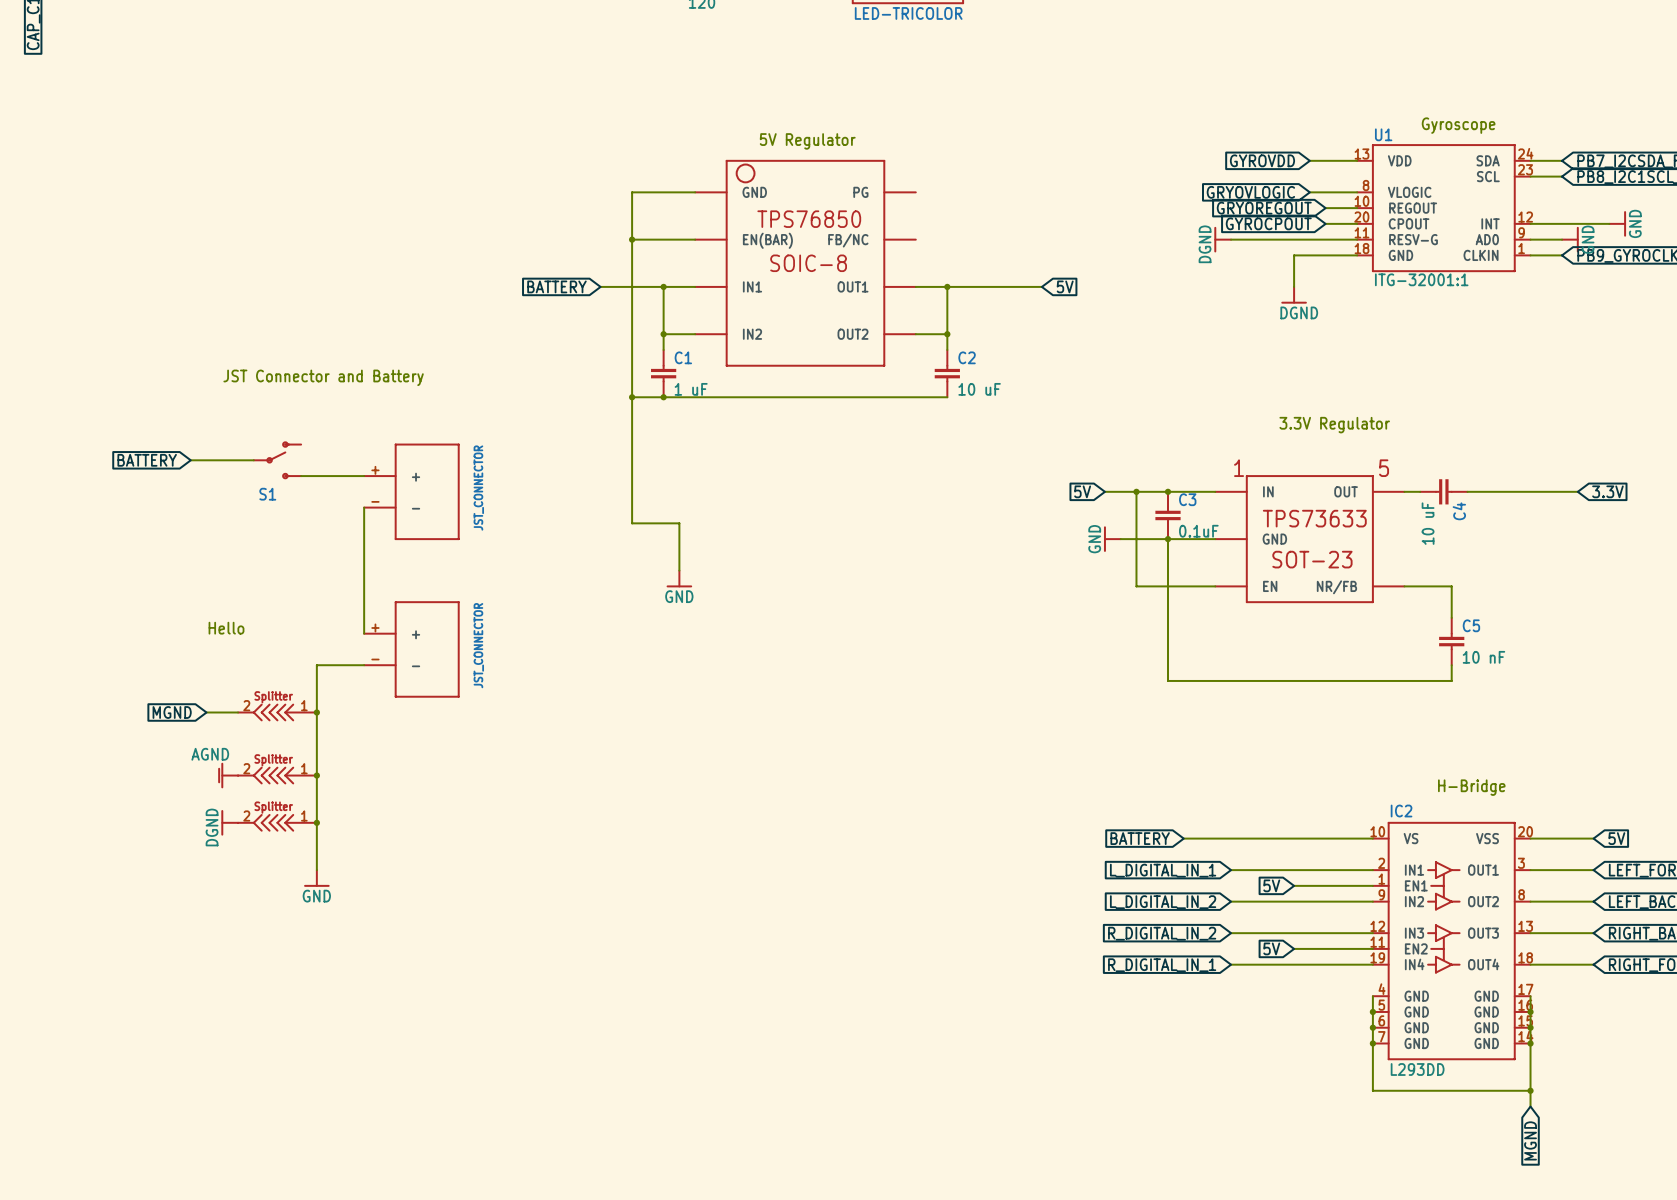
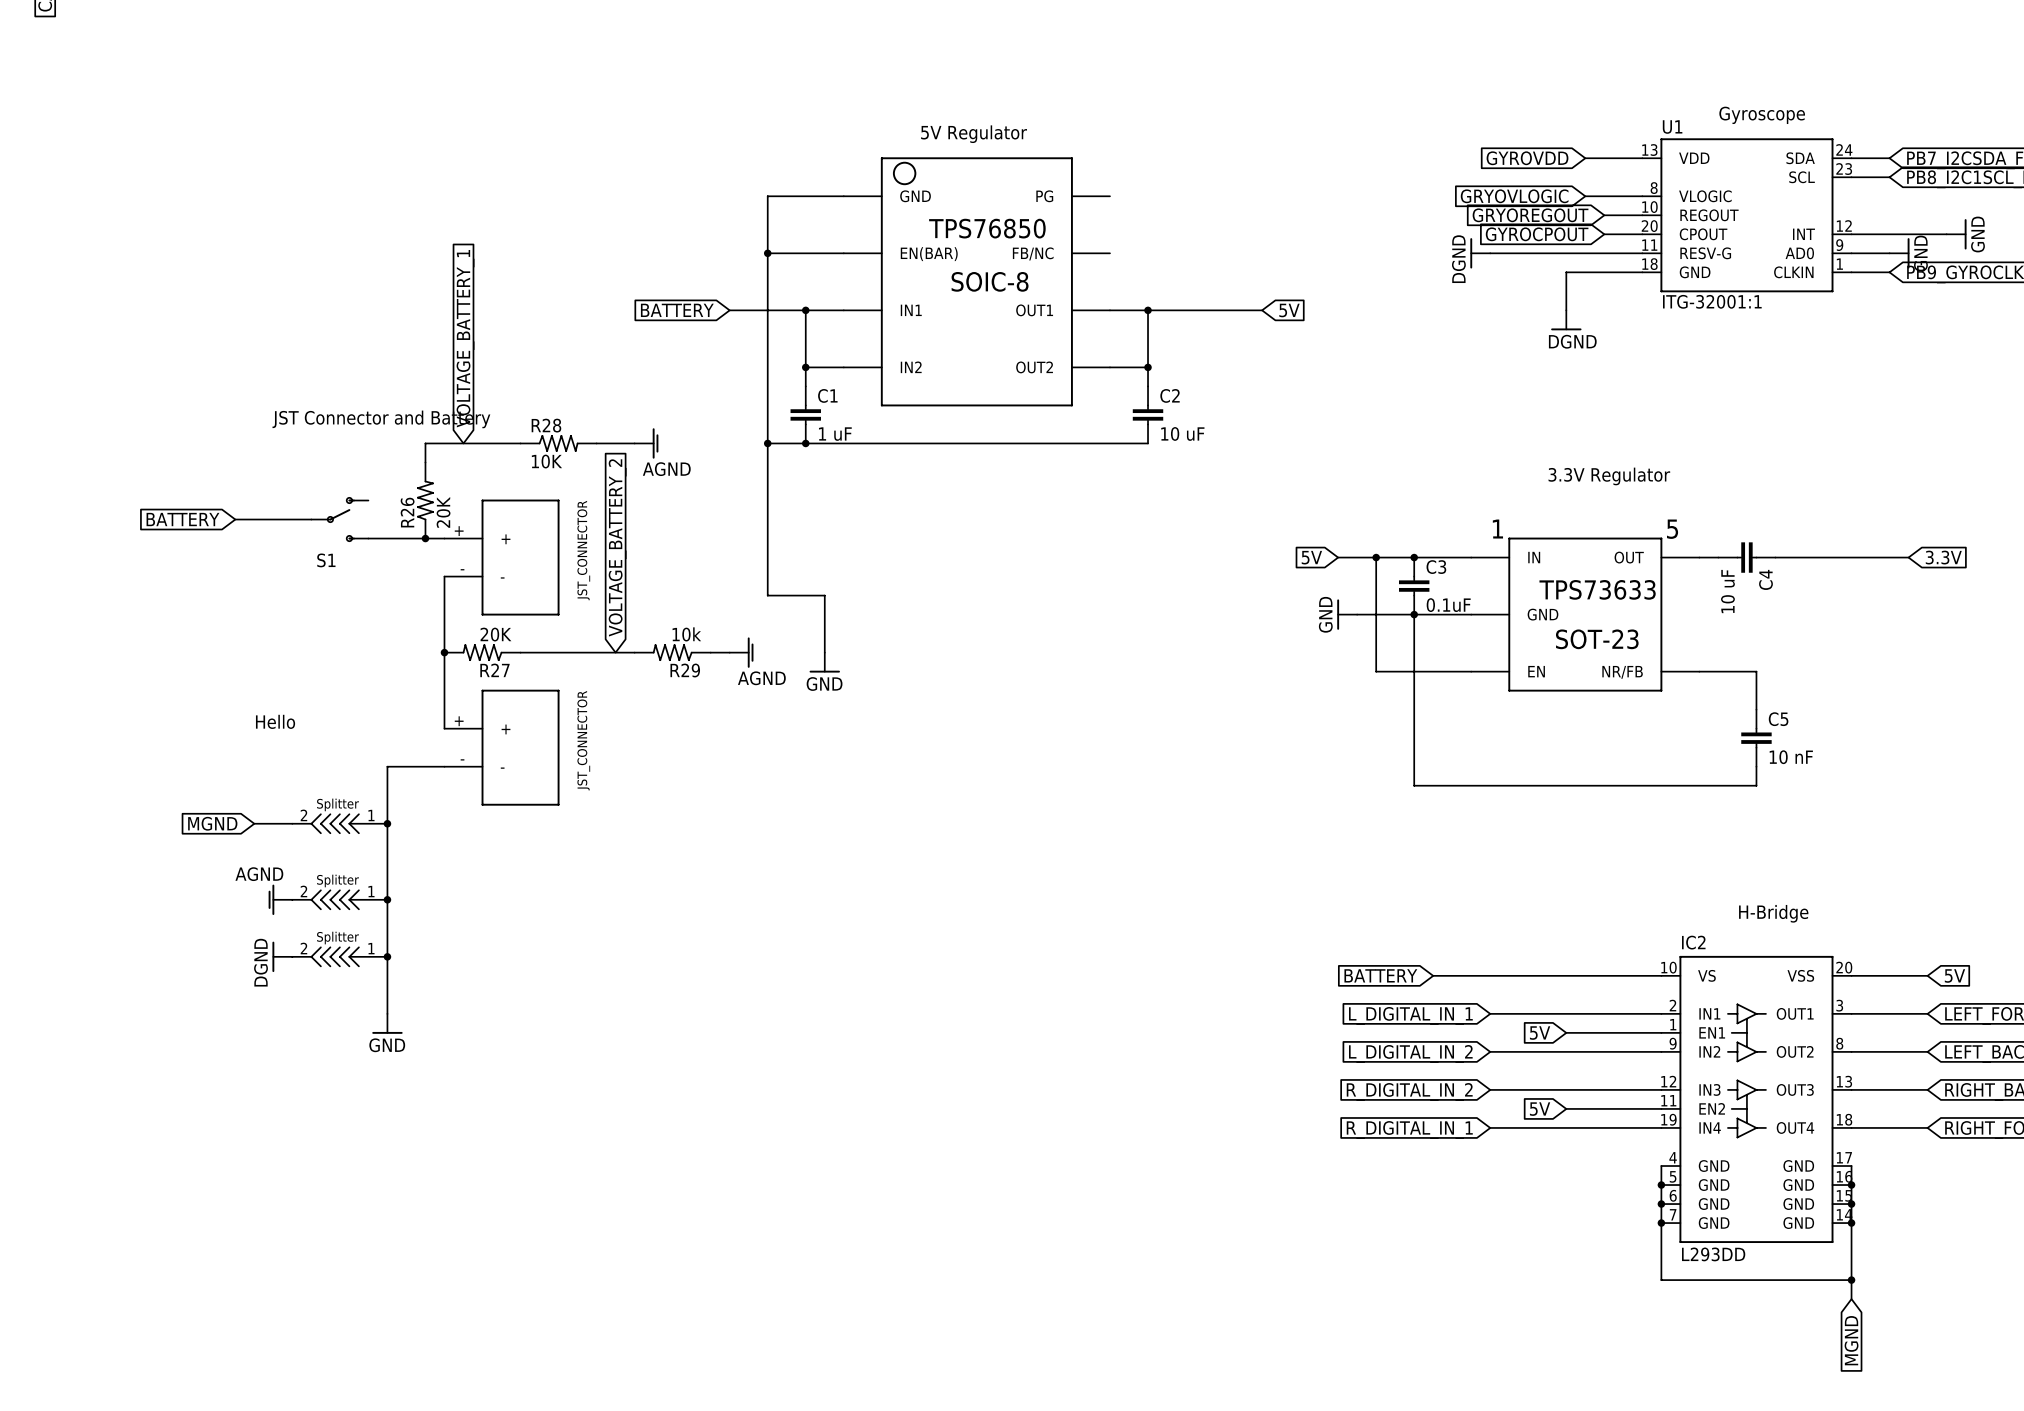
global label: none -> VOLTAGE_BATTERY_1 (465, 338)
wire: none -> (520, 443) (425, 443) (425, 462)
R28: none -> 10K (558, 443)
wire: none -> (596, 443) (634, 443)
power symbol: none -> AGND (646, 443)
R26: none -> 20K (425, 500)
junction: none -> (425, 538)
global label: none -> VOLTAGE_BATTERY_2 (617, 547)
junction: none -> (444, 652)
R27: none -> 20K (482, 652)
wire: none -> (520, 652) (634, 652)
R29: none -> 10k (672, 652)
wire: none -> (710, 652) (729, 652)
power symbol: none -> AGND (741, 652)

